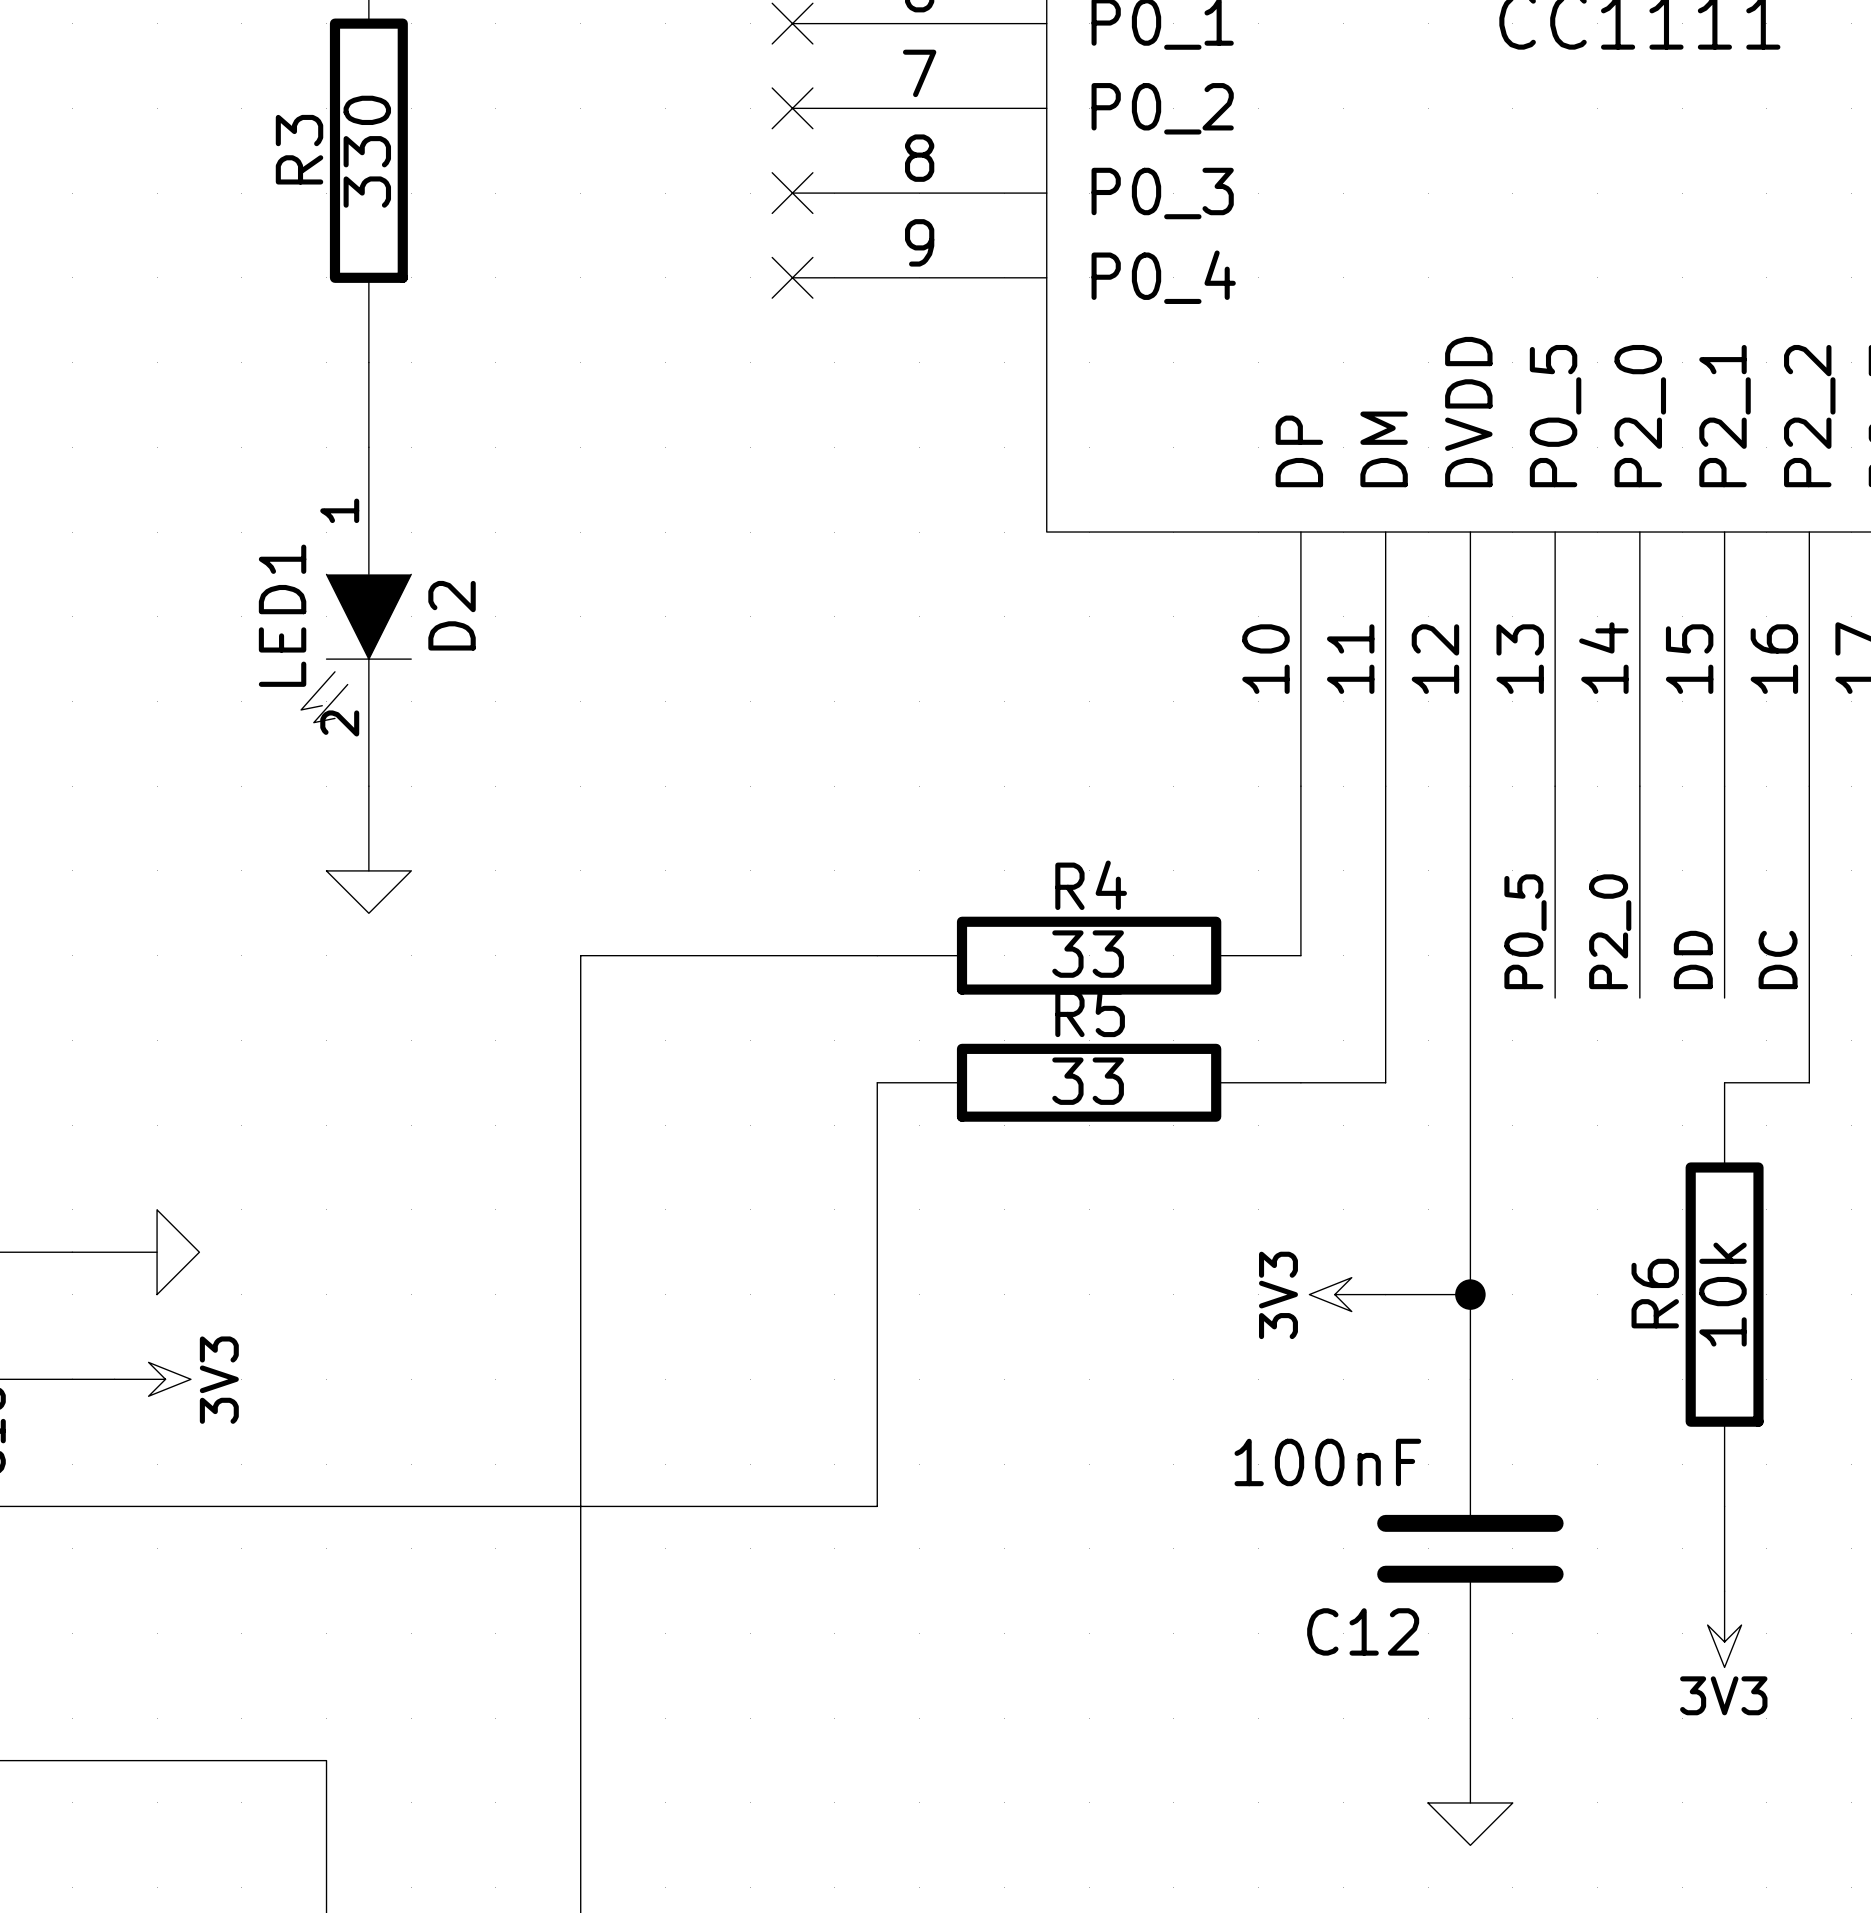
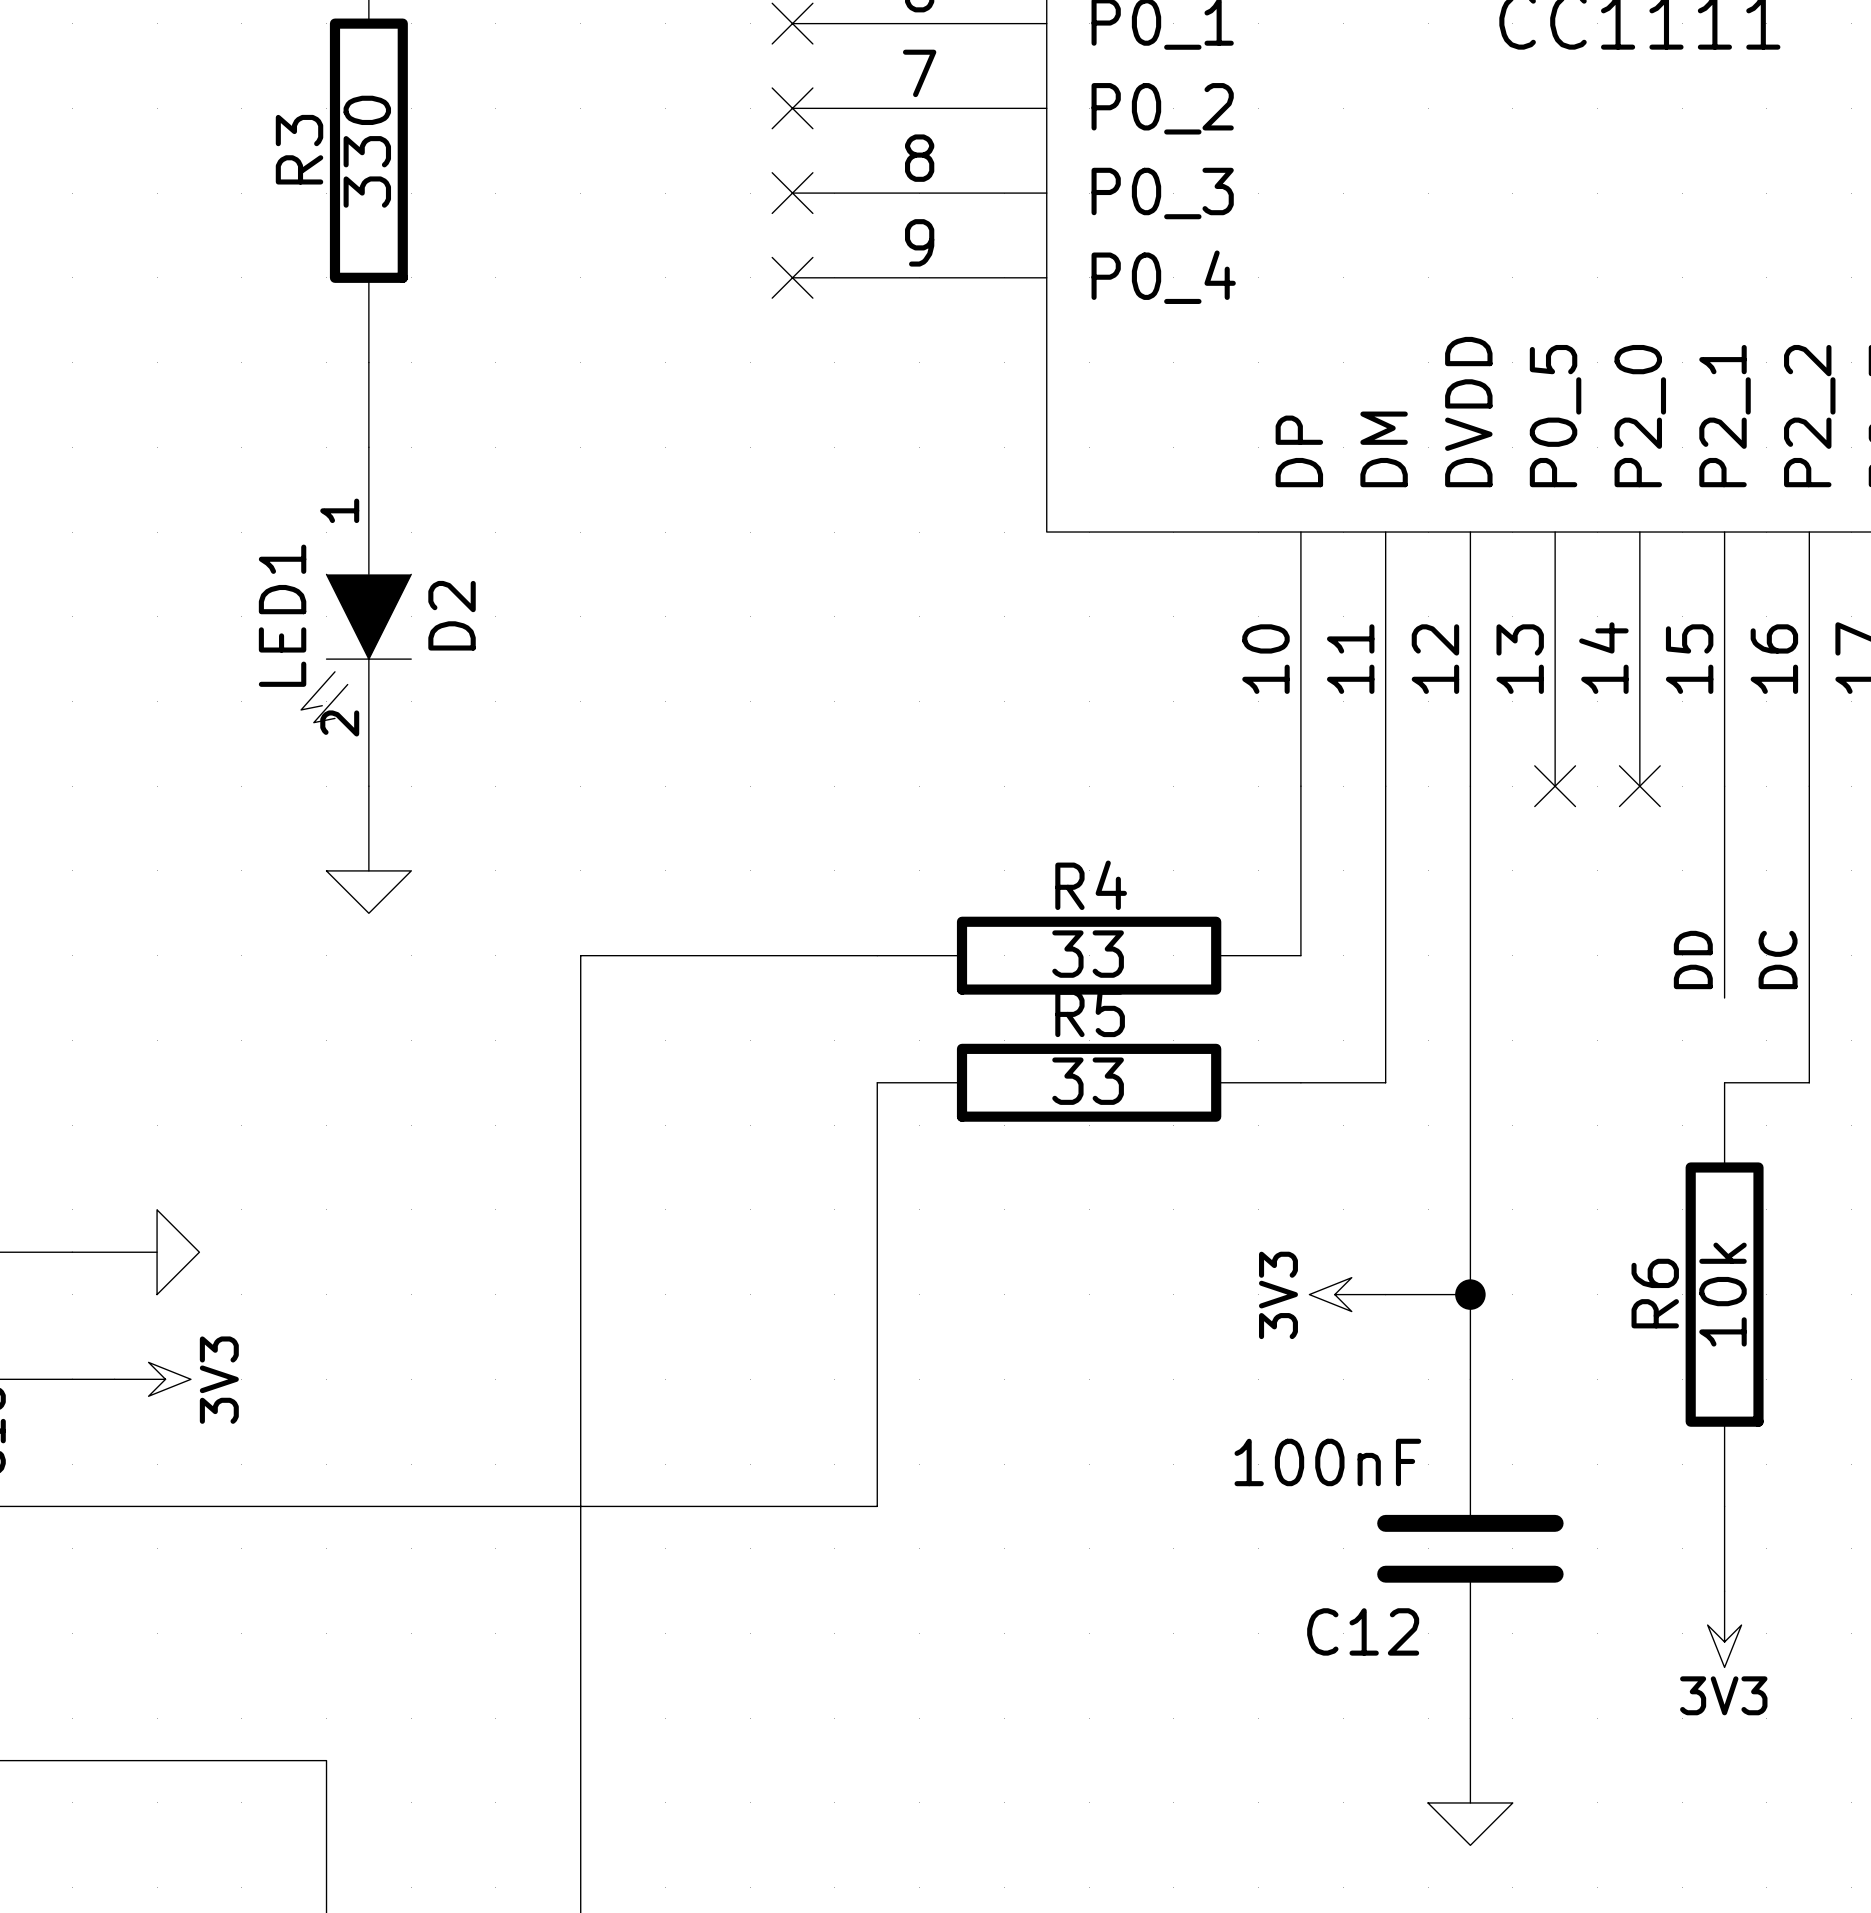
wire: (1555, 786) (1555, 998) -> none
no-connect mark: none -> (1555, 786)
wire: (1639, 786) (1639, 998) -> none
no-connect mark: none -> (1639, 786)
label: P0_5 (1525, 931) -> none
label: P2_0 (1610, 931) -> none

